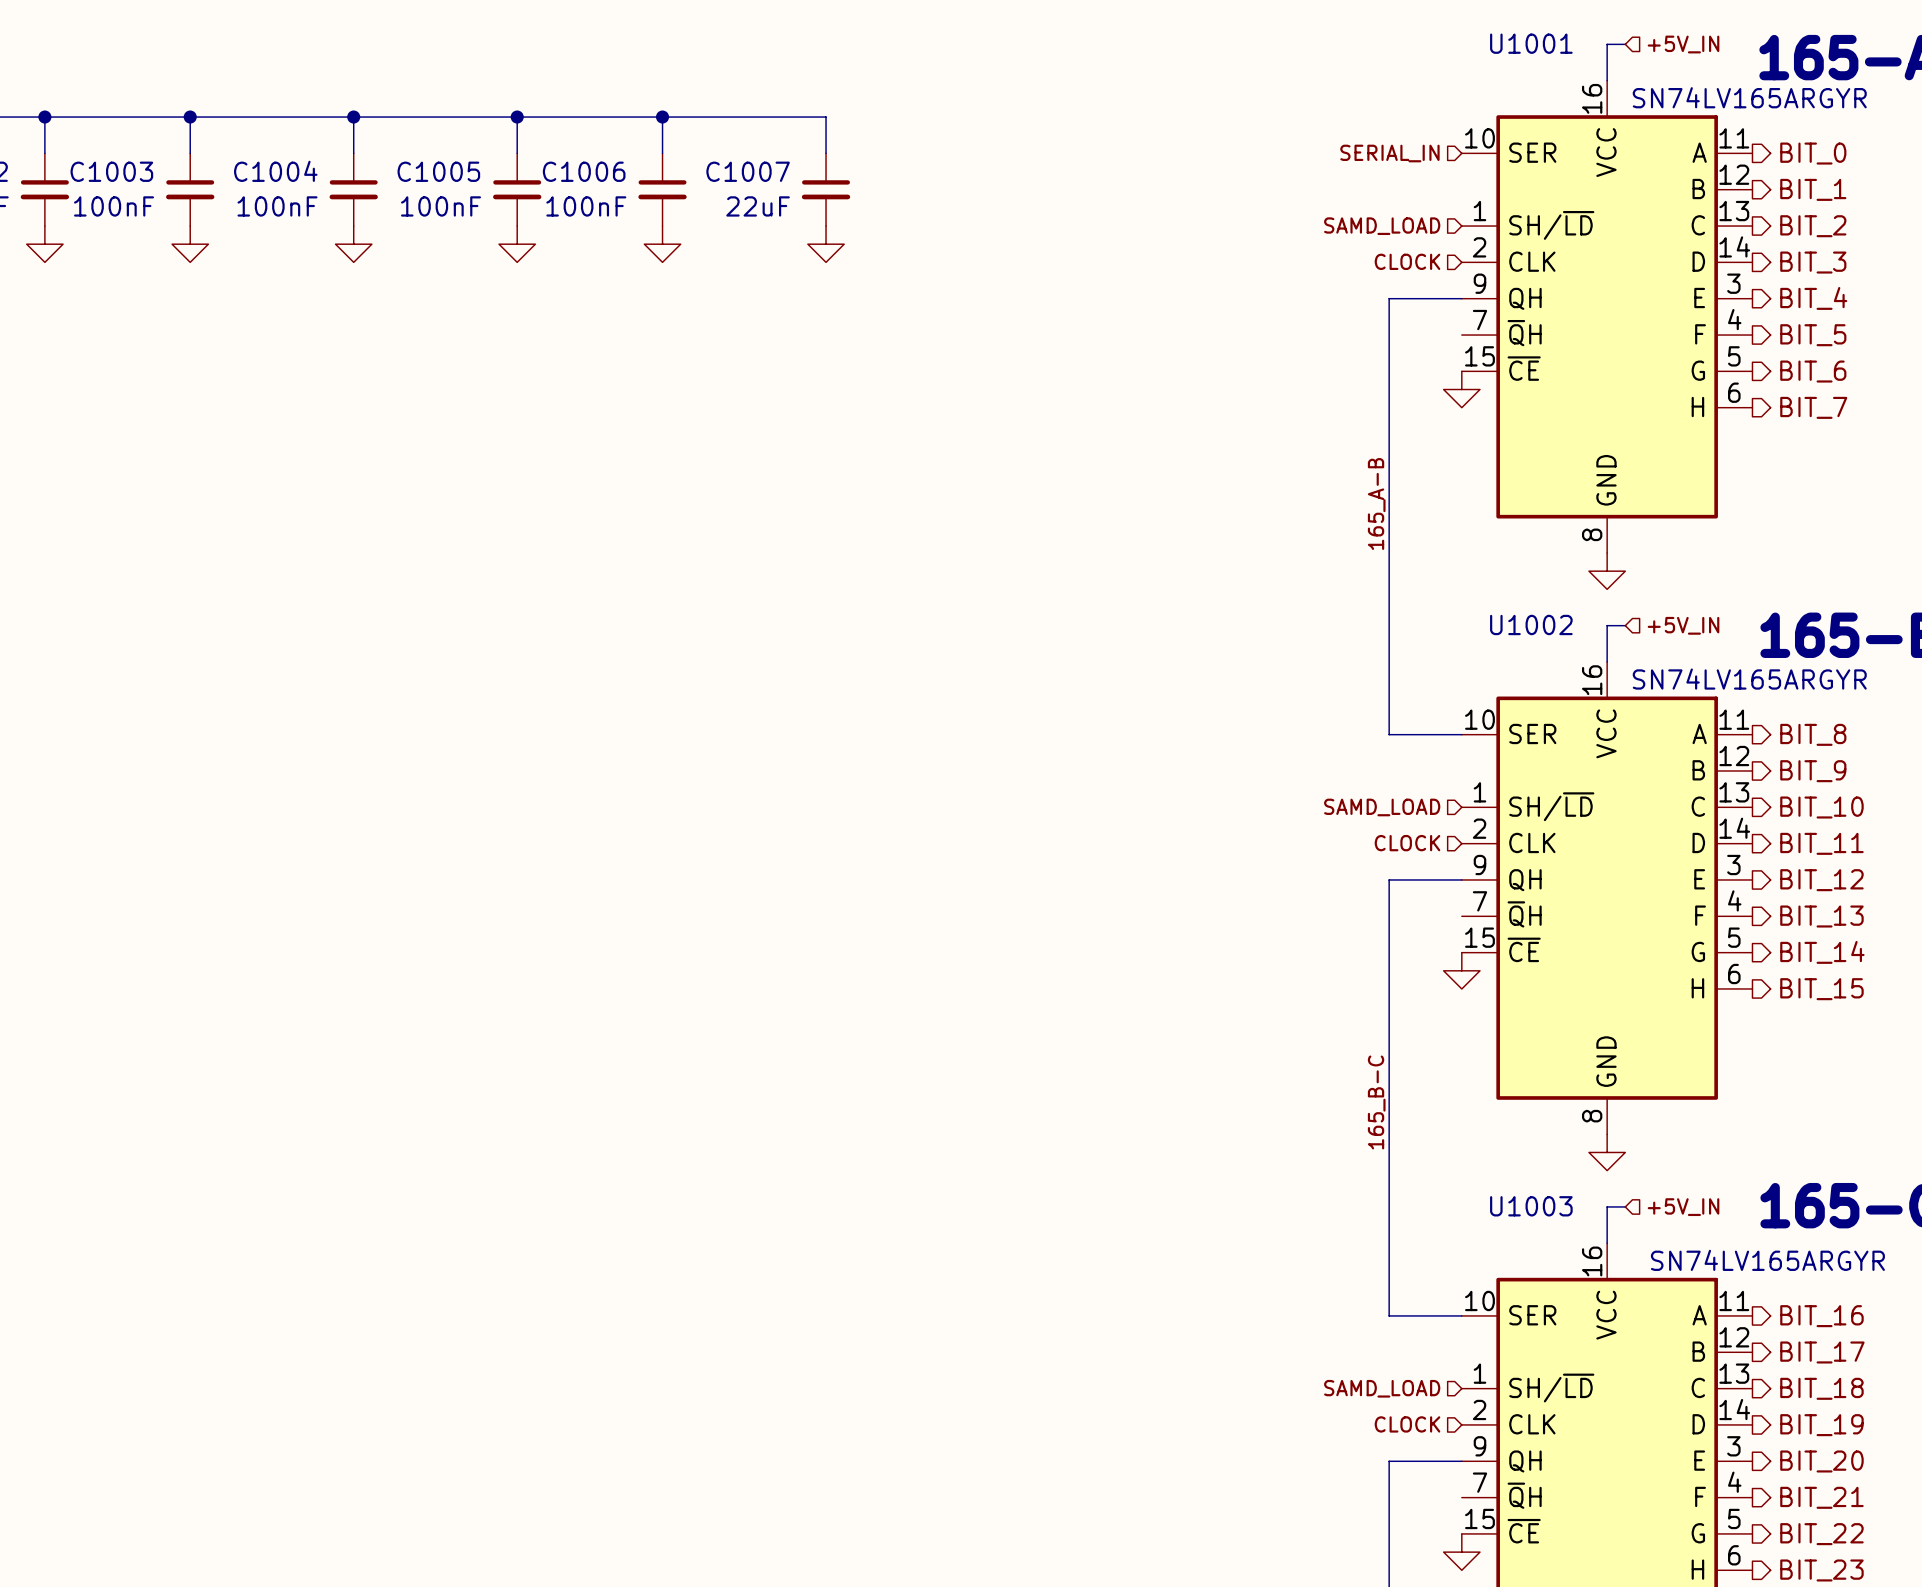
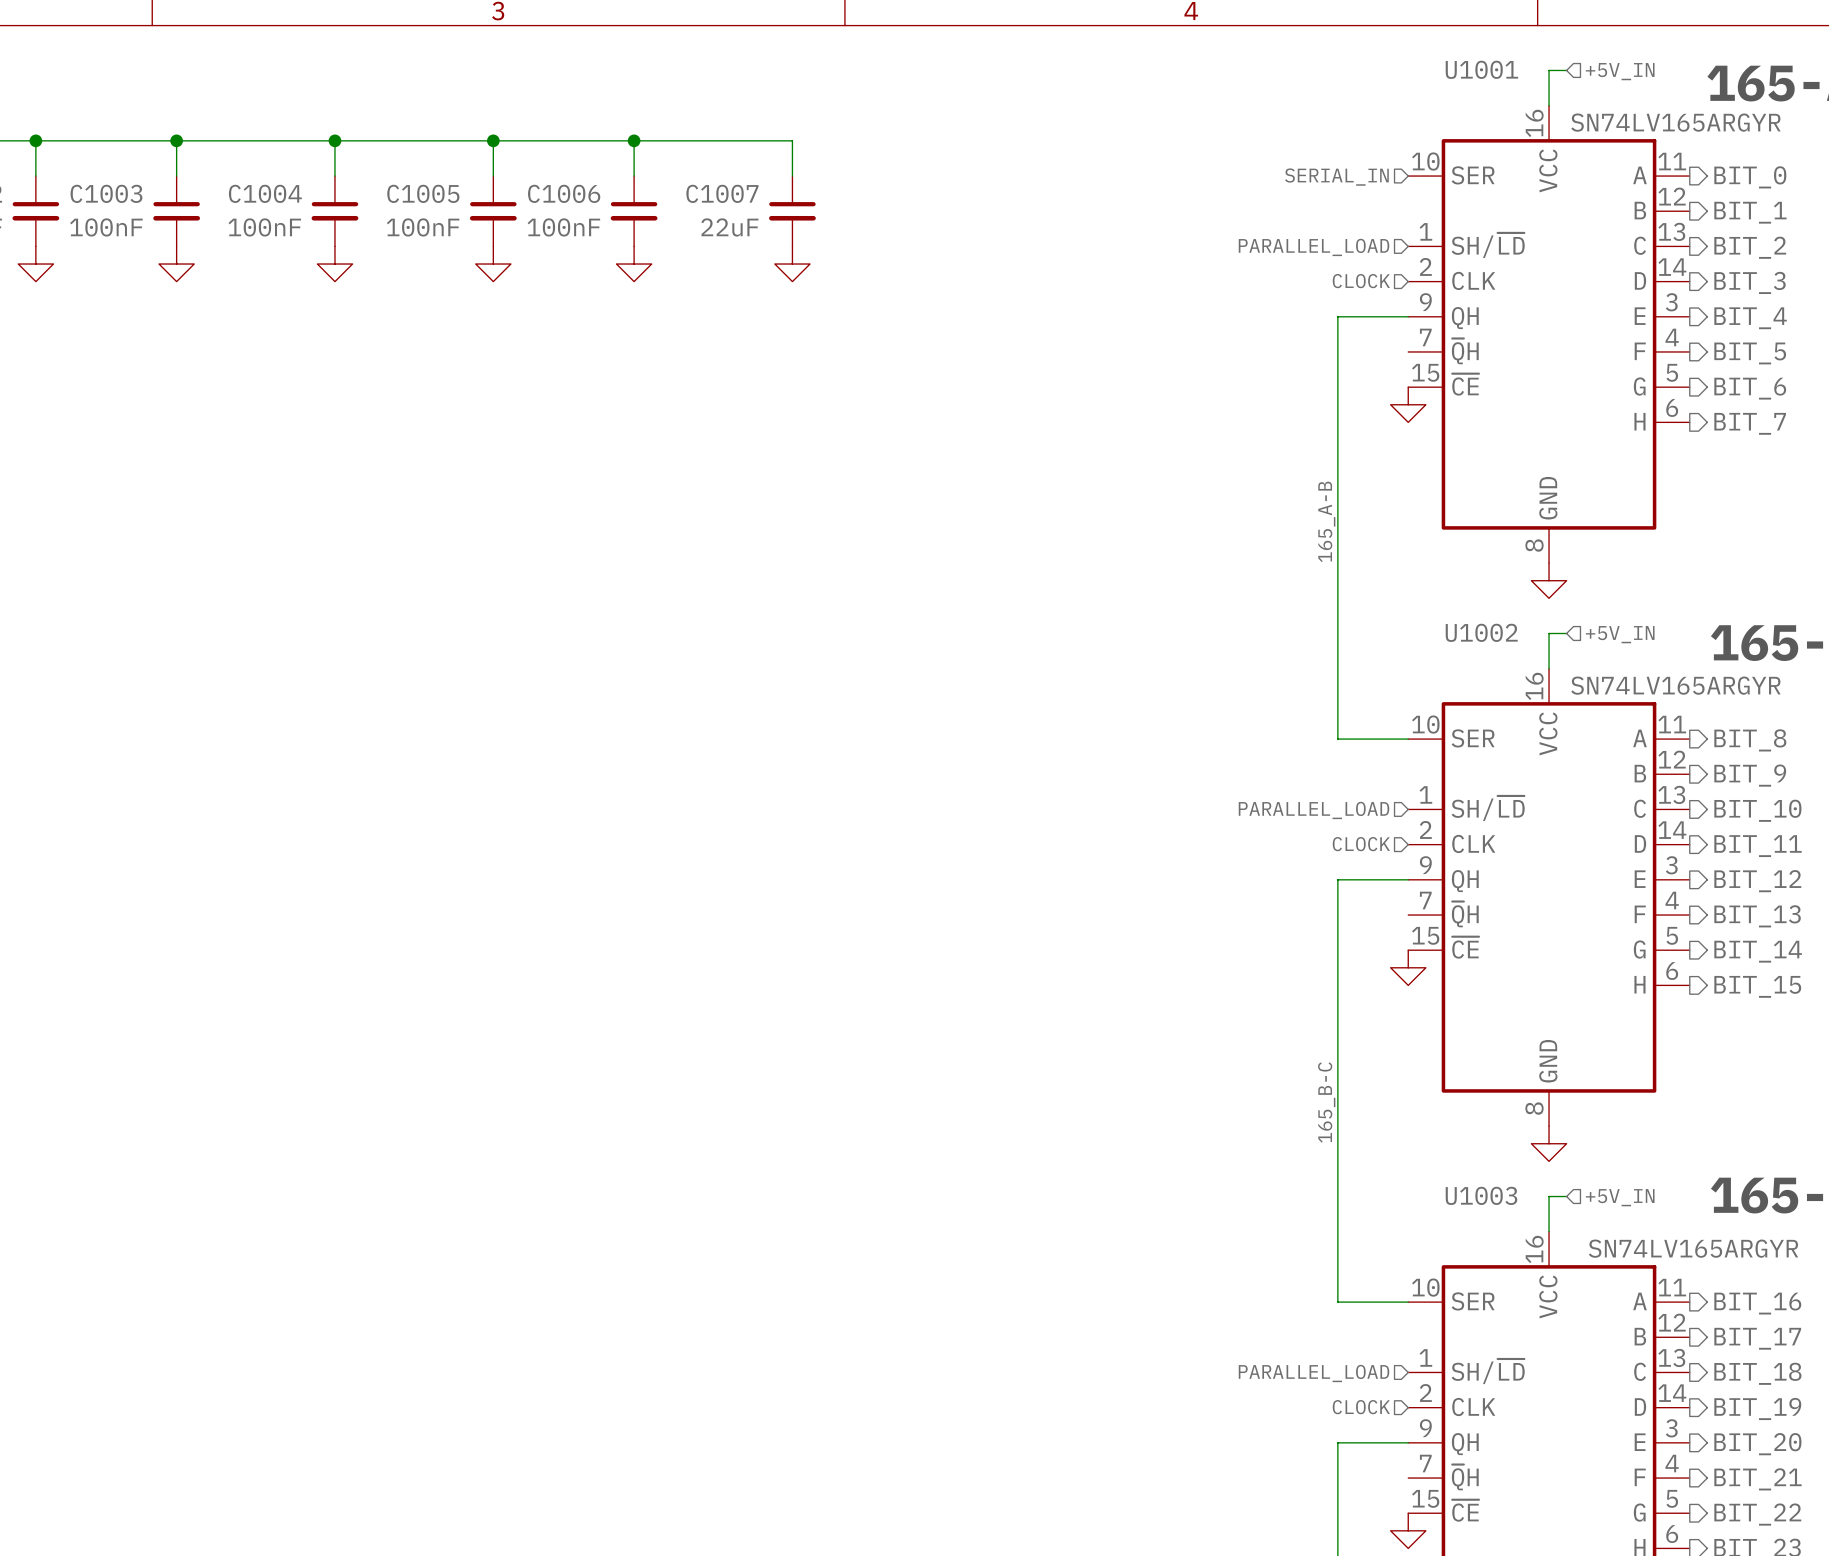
hierarchical label: SAMD_LOAD (1382, 226) -> PARALLEL_LOAD (1314, 247)
hierarchical label: SAMD_LOAD (1382, 807) -> PARALLEL_LOAD (1314, 810)
hierarchical label: SAMD_LOAD (1382, 1388) -> PARALLEL_LOAD (1314, 1373)

